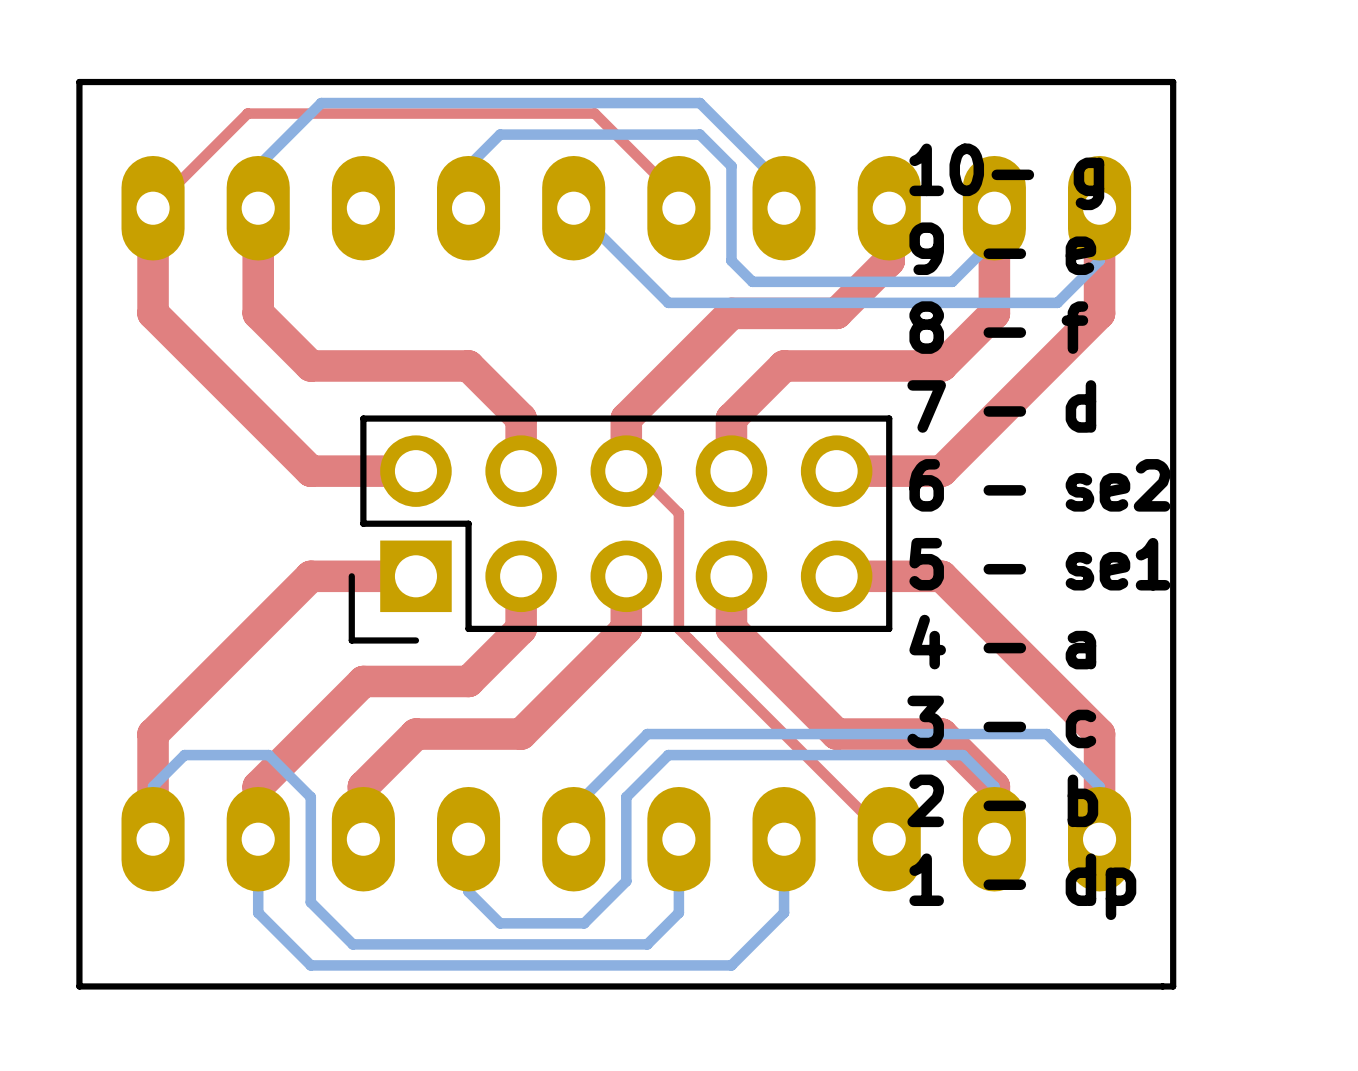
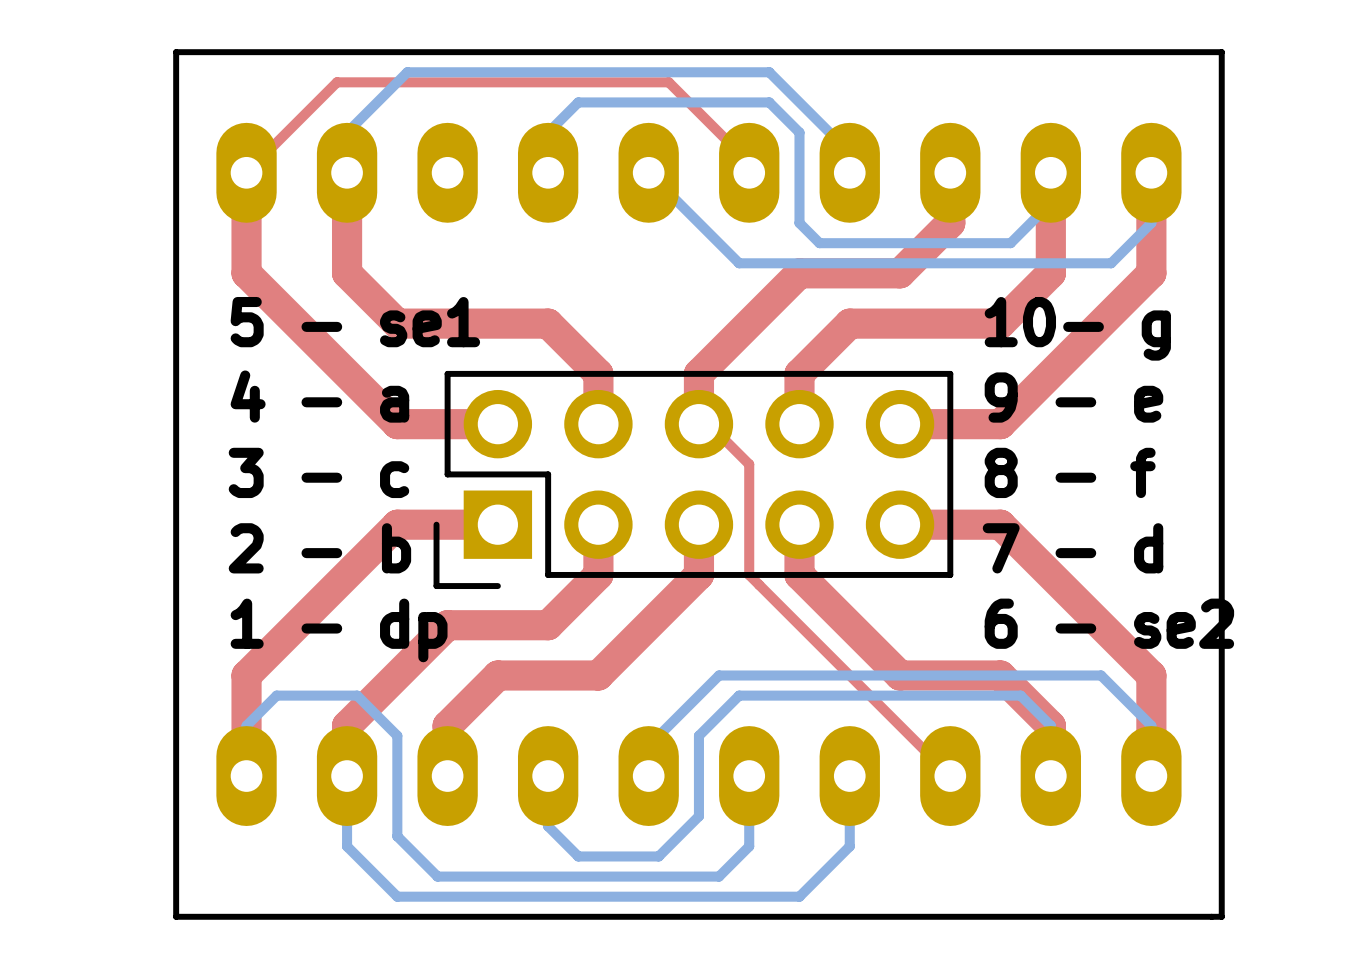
text position: 10- g (1006, 176) -> 10- g (1077, 328)
text position: 9 - e (1002, 248) -> 9 - e (1073, 397)
text position: 8 - f (998, 327) -> 8 - f (1070, 472)
text position: 7 - d (1001, 406) -> 7 - d (1073, 548)
text position: 6 - se2 (1039, 485) -> 6 - se2 (1109, 623)
text position: 5 - se1 (1039, 564) -> 5 - se1 (355, 322)
text position: 4 - a (1002, 642) -> 4 - a (319, 396)
text position: 3 - c (1001, 721) -> 3 - c (318, 472)
text position: 2 - b (1002, 800) -> 2 - b (319, 548)
text position: 1 - dp (1022, 886) -> 1 - dp (339, 630)

